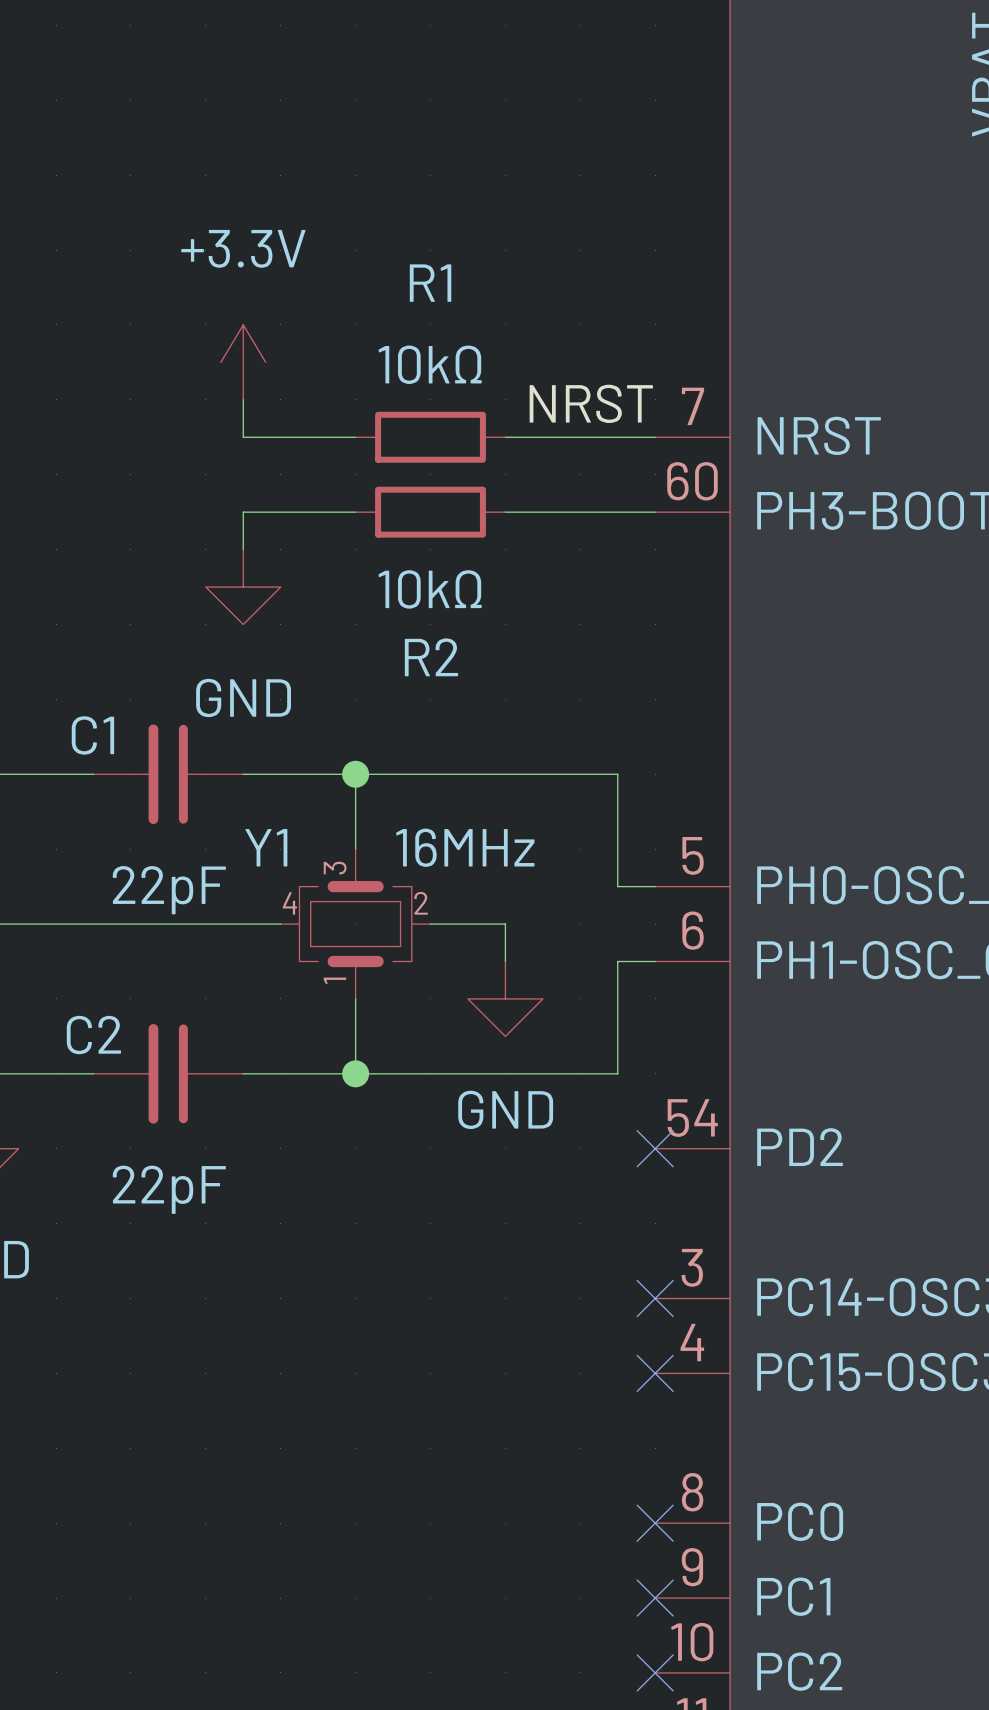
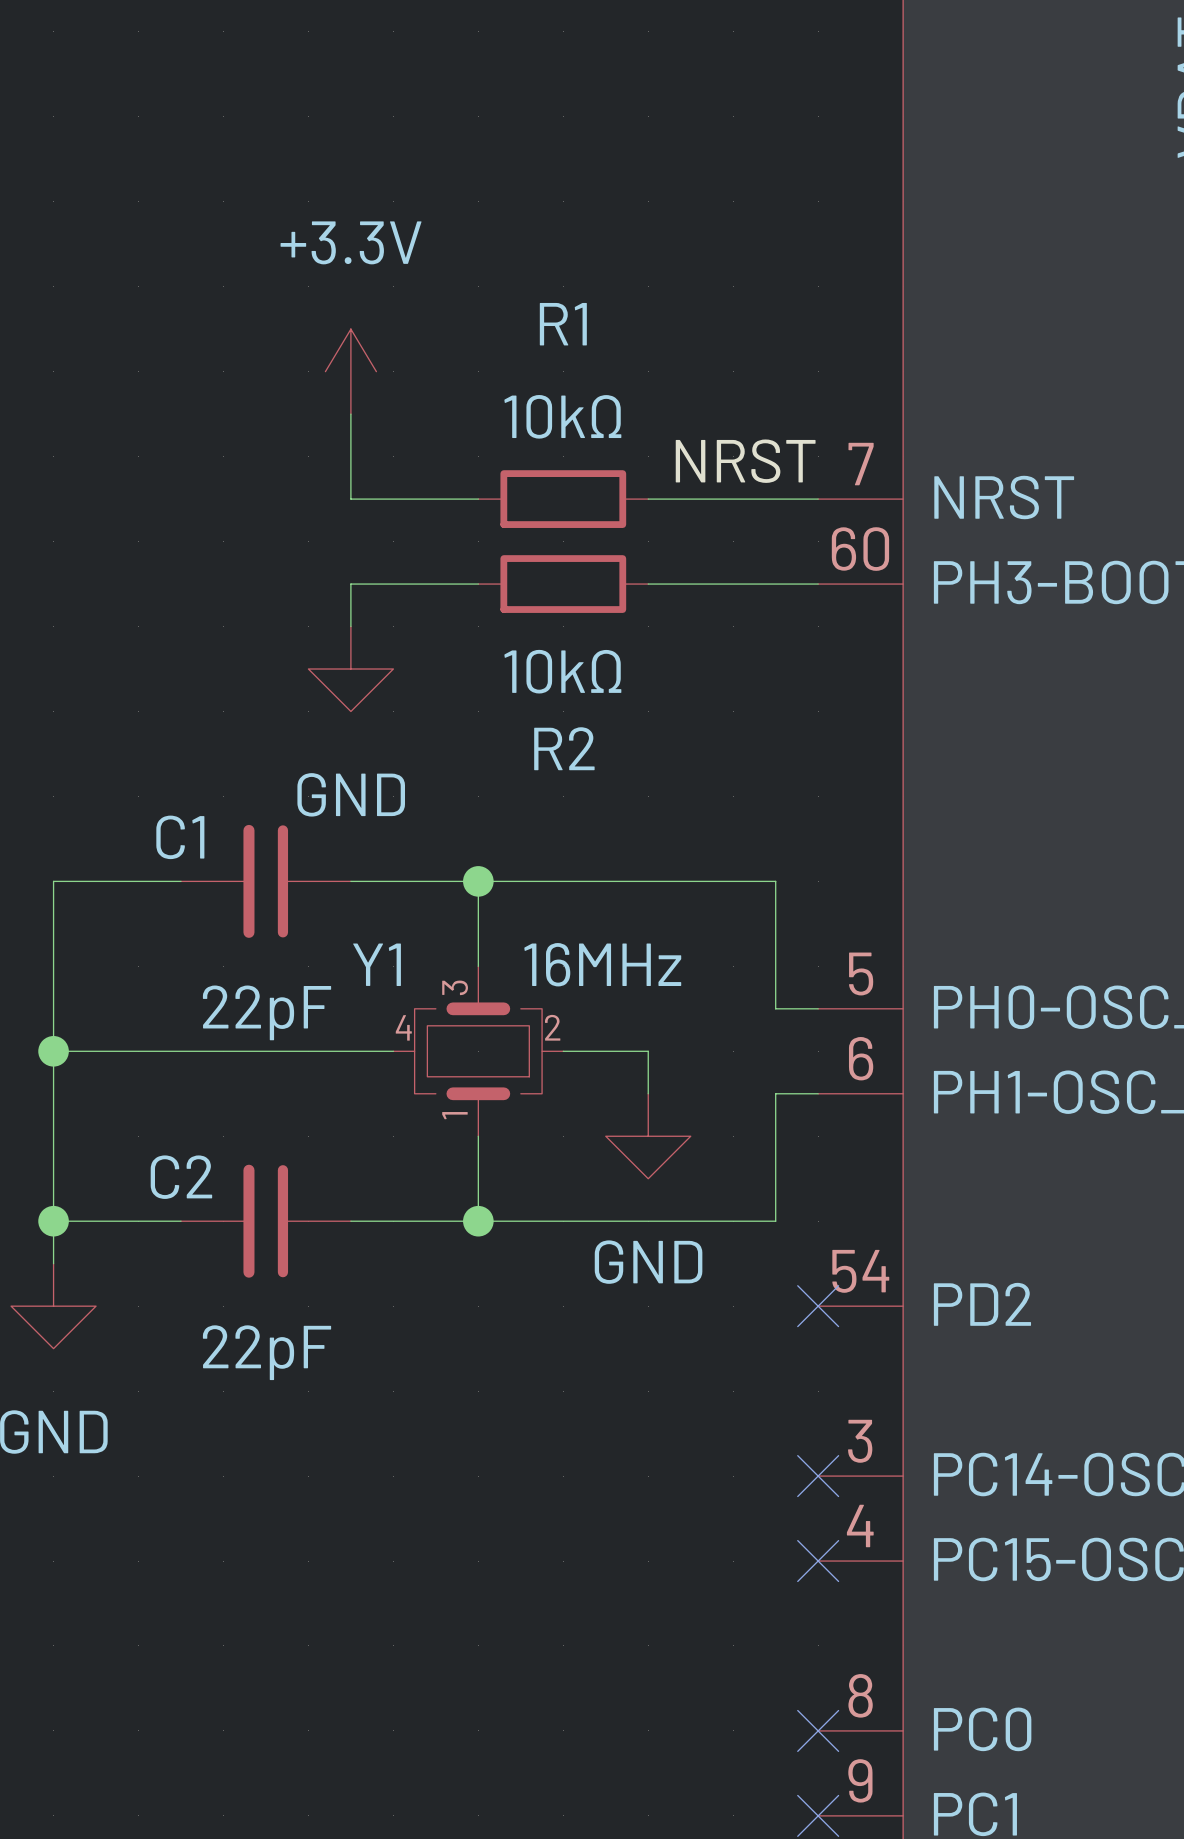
power symbol position: +3.3V (243, 362) -> +3.3V (350, 371)

